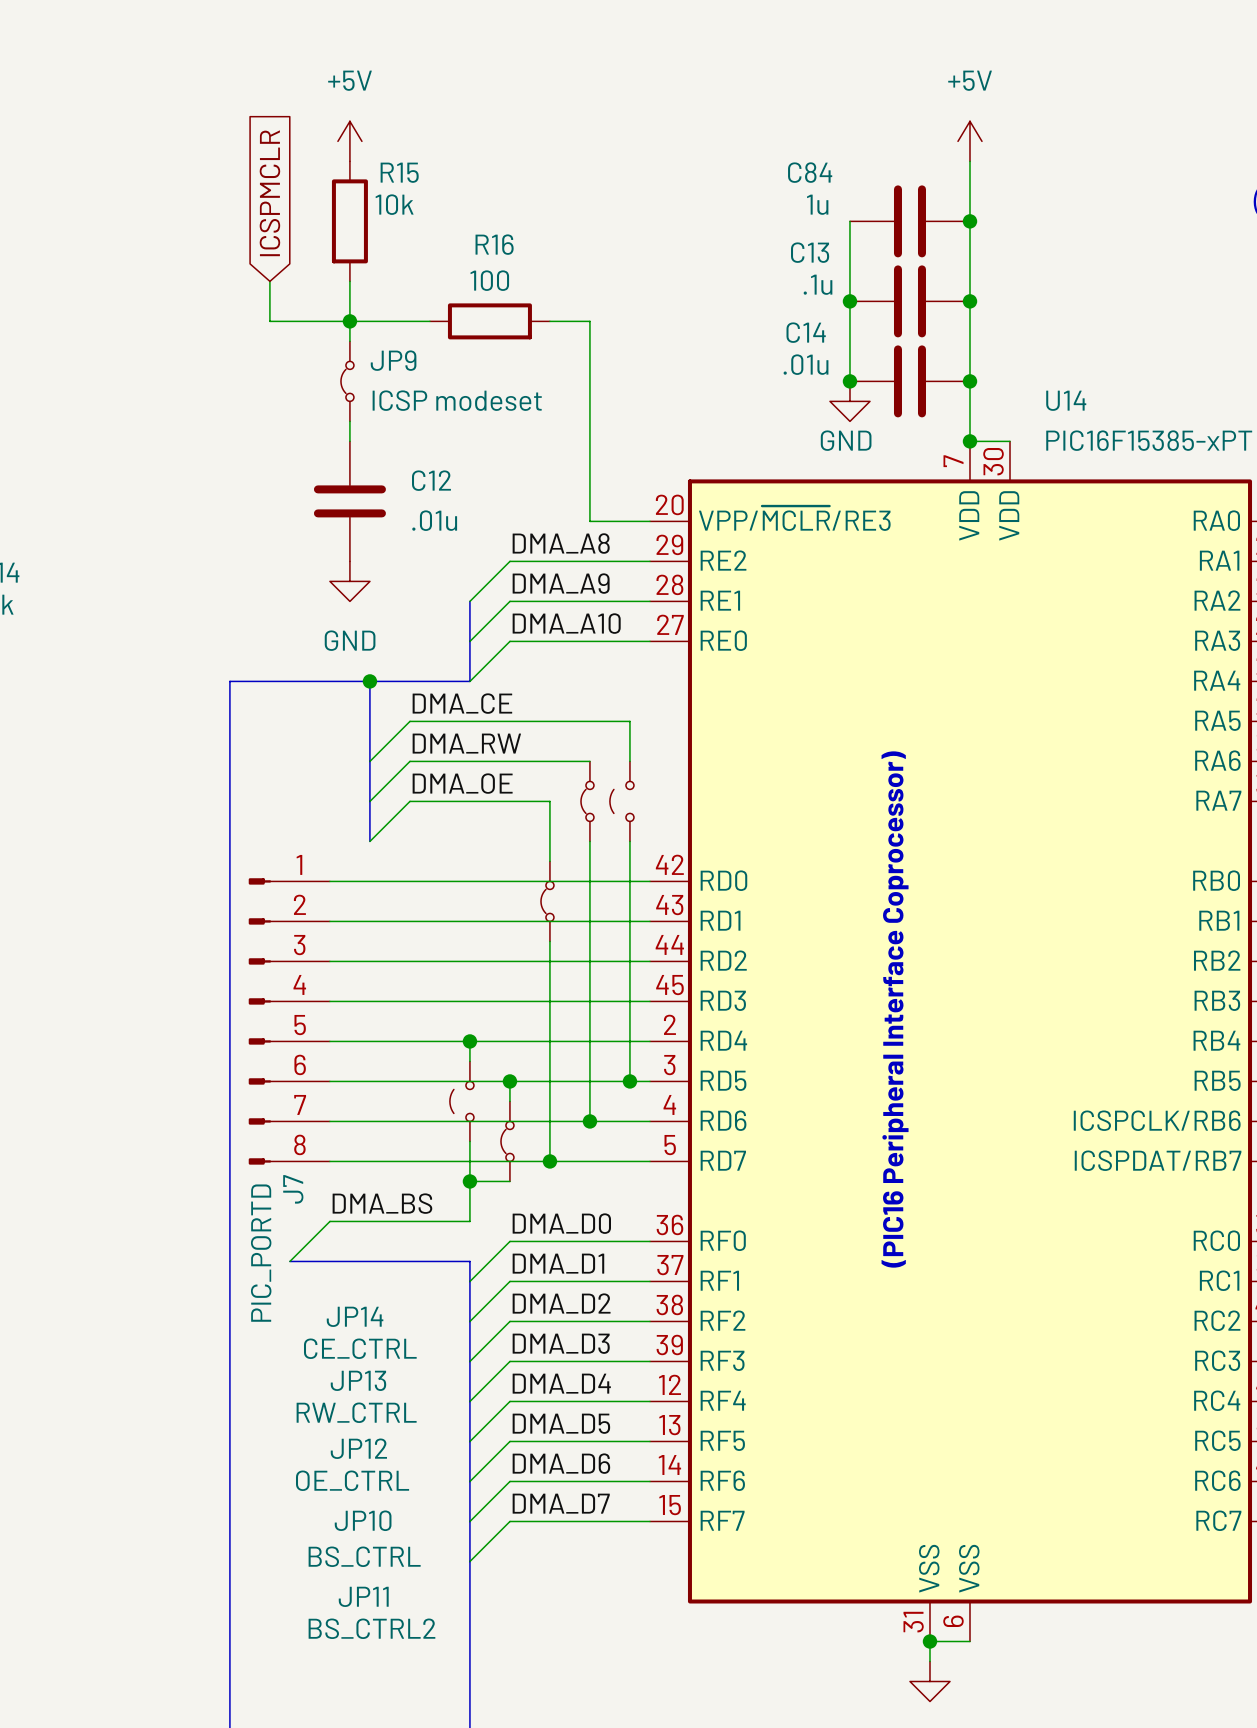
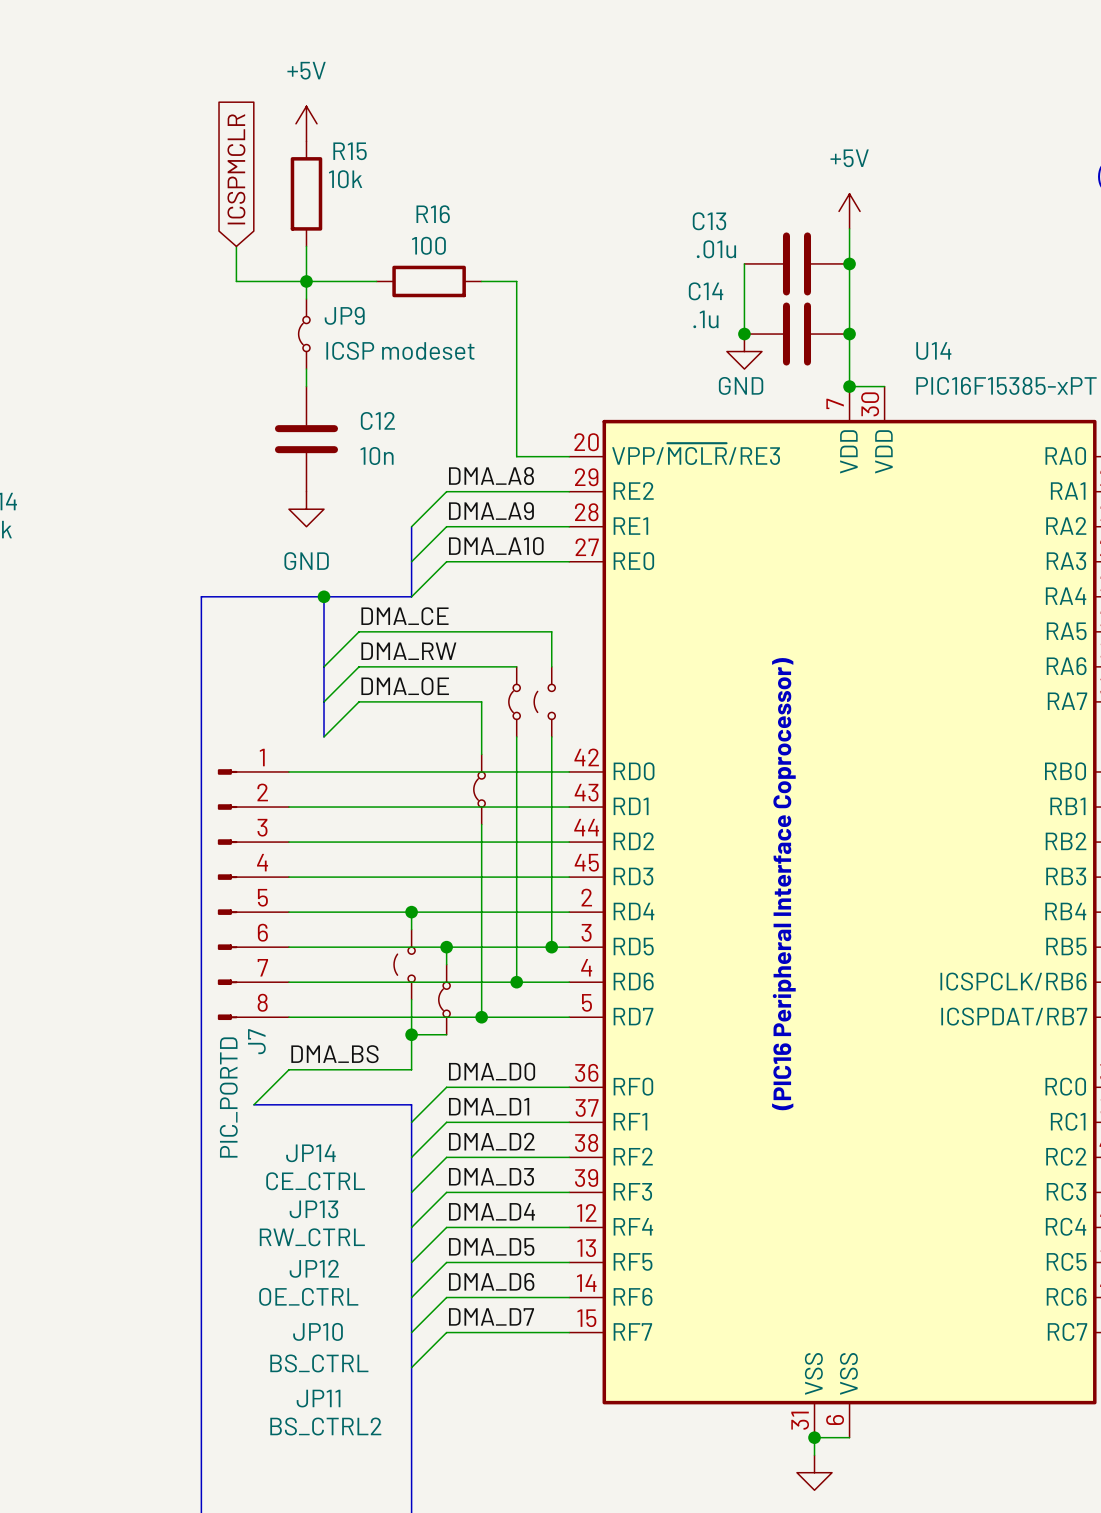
power symbol position: +5V (969, 141) -> +5V (849, 211)
wire: (969, 161) (969, 261) -> none
wire: (849, 221) (849, 301) -> none
C84: 1u (909, 221) -> none
junction: (969, 221) -> none
C13 value: .1u (818, 284) -> .01u (716, 249)
junction: (849, 301) -> none
C14 value: .01u (806, 364) -> .1u (705, 319)
C12 value: .01u (434, 520) -> 10n (377, 456)

